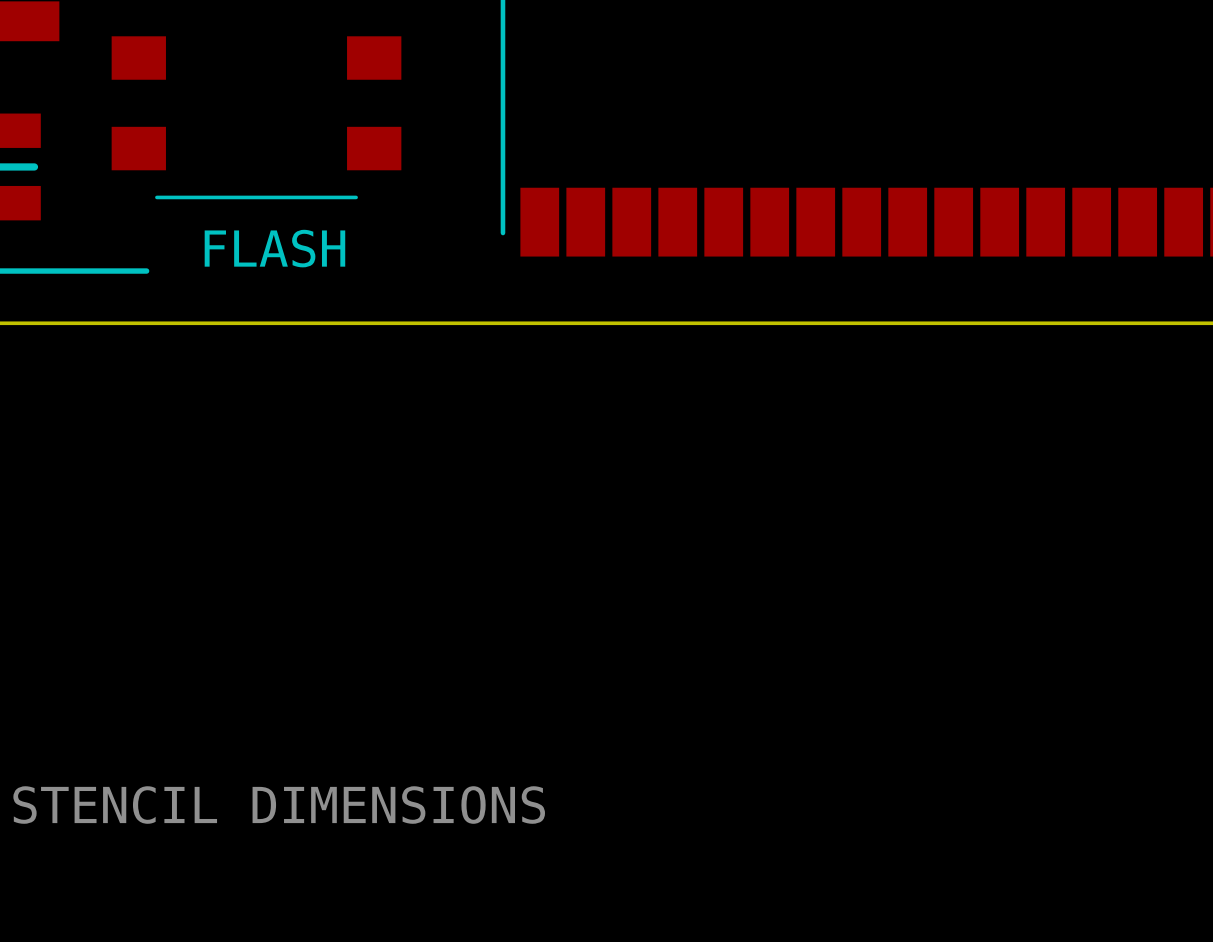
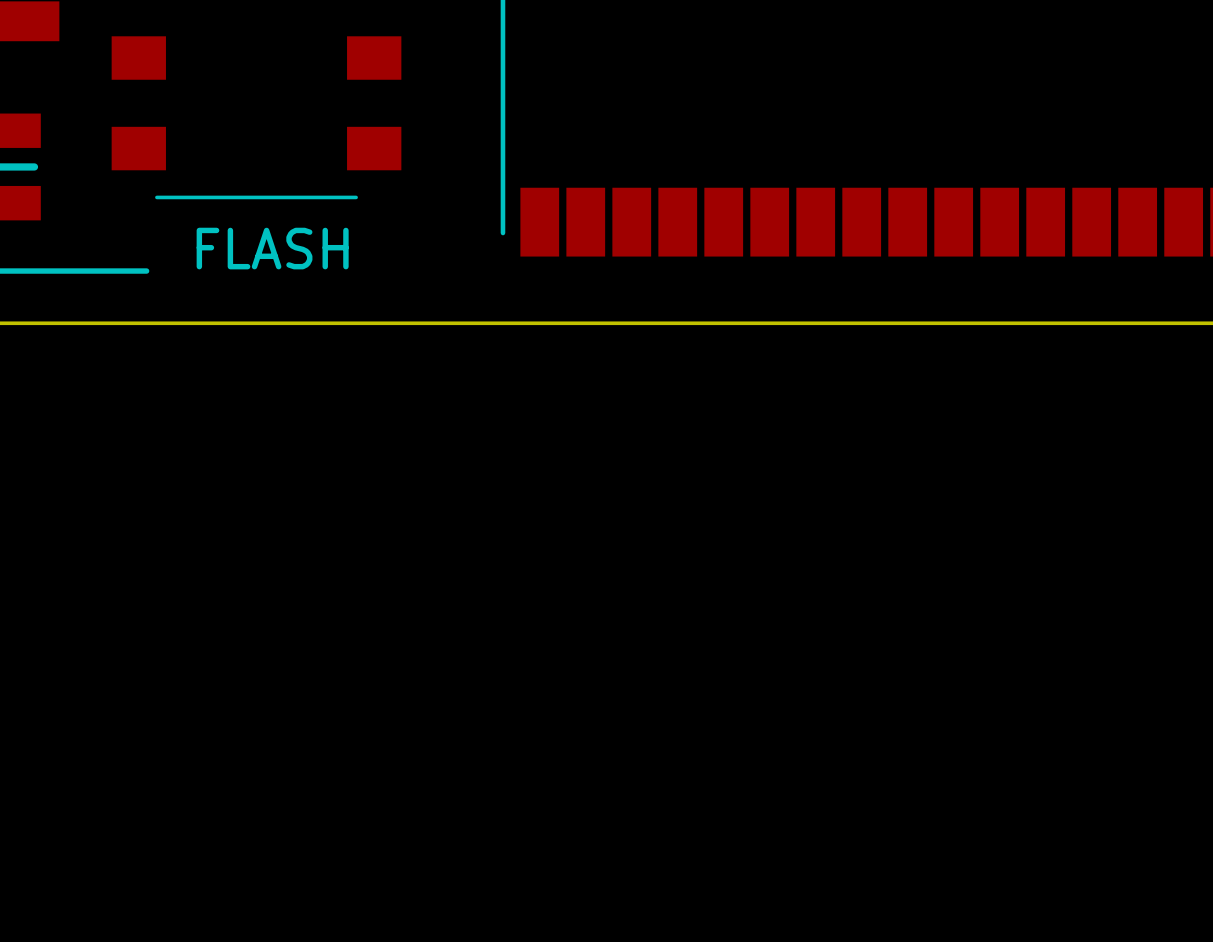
text: STENCIL DIMENSIONS (279, 805) -> none

